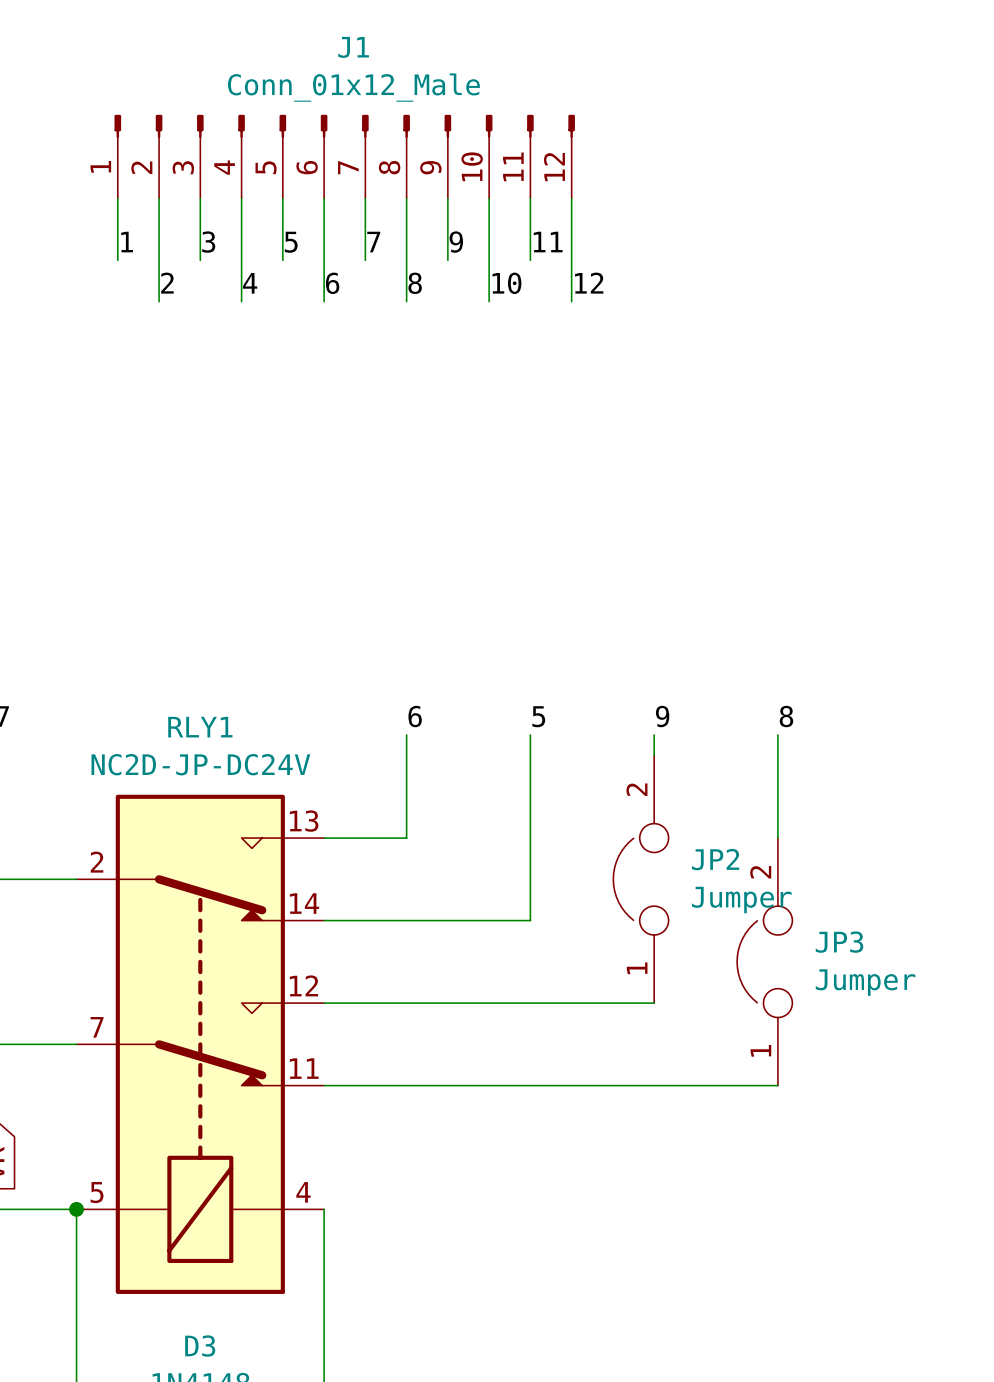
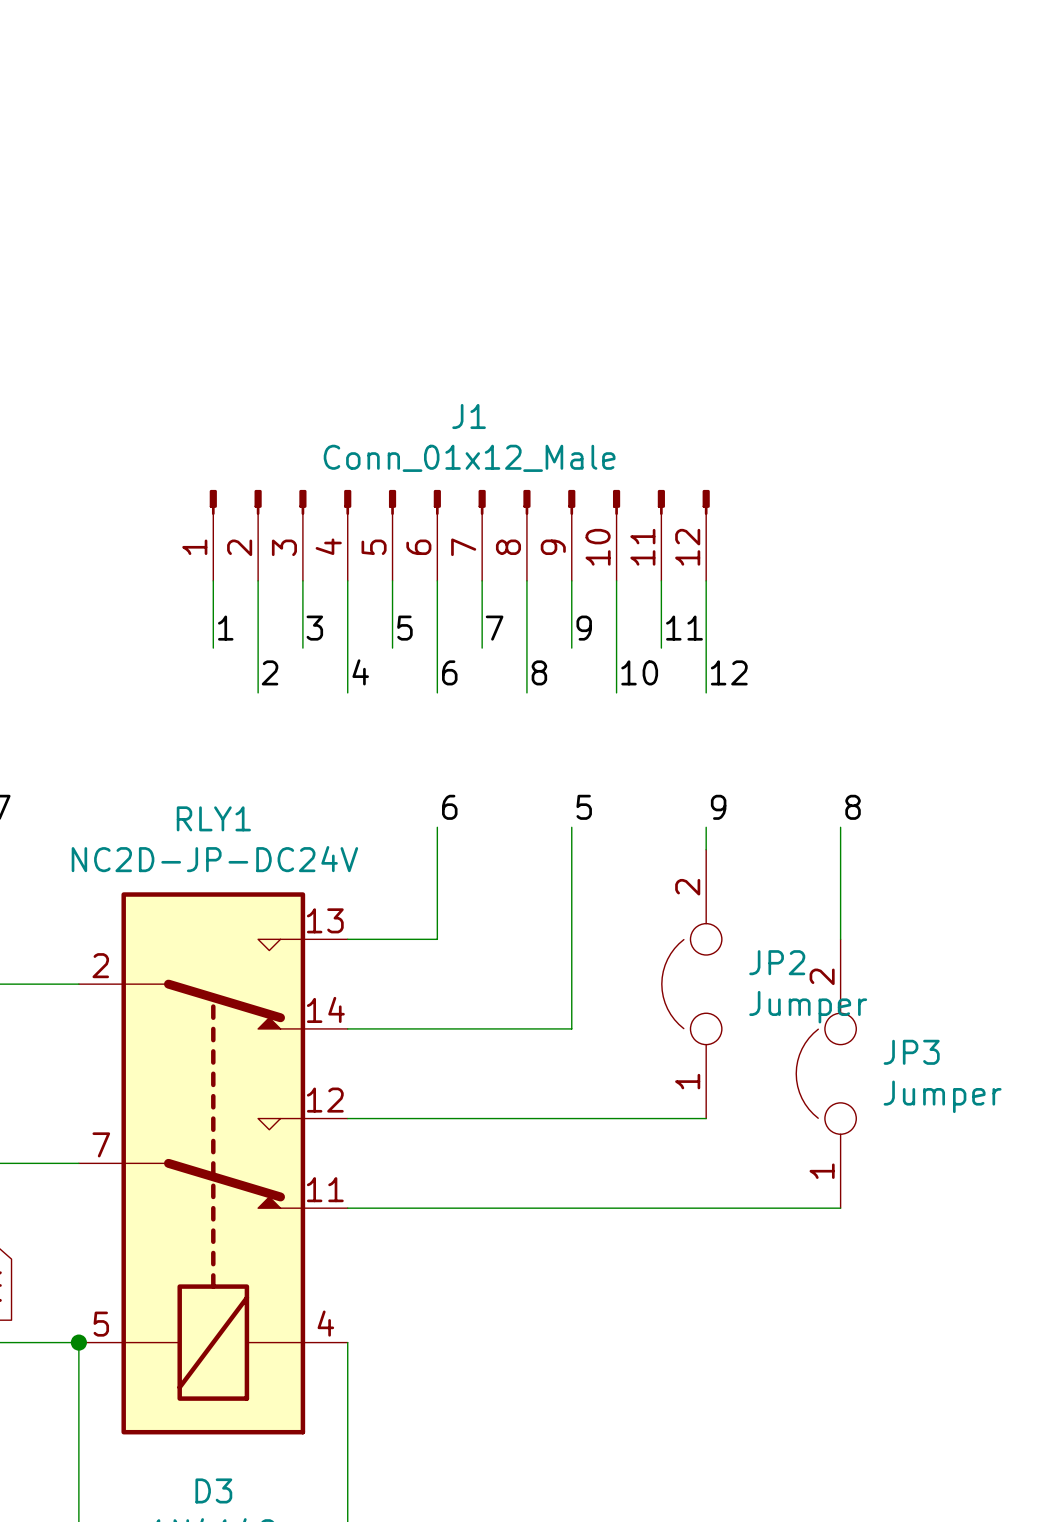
J1 position: (344, 156) -> (459, 535)
wire: (117, 198) (117, 260) -> (213, 580) (213, 648)
wire: (159, 198) (159, 301) -> (258, 580) (258, 692)
wire: (200, 198) (200, 260) -> (302, 580) (302, 648)
wire: (241, 198) (241, 301) -> (347, 580) (347, 692)
wire: (282, 198) (282, 260) -> (392, 580) (392, 648)
wire: (324, 198) (324, 301) -> (437, 580) (437, 692)
wire: (365, 198) (365, 260) -> (482, 580) (482, 648)
wire: (406, 198) (406, 301) -> (526, 580) (526, 692)
wire: (447, 198) (447, 260) -> (571, 580) (571, 648)
wire: (489, 198) (489, 301) -> (616, 580) (616, 692)
wire: (530, 198) (530, 260) -> (661, 580) (661, 648)
wire: (571, 198) (571, 301) -> (706, 580) (706, 692)
label position: 1 (127, 242) -> 1 (225, 628)
label position: 3 (208, 242) -> 3 (314, 628)
label position: 5 (291, 242) -> 5 (404, 628)
label position: 7 (373, 242) -> 7 (494, 628)
label position: 9 (456, 242) -> 9 (584, 628)
label position: 11 (548, 242) -> 11 (684, 628)
label position: 2 (167, 283) -> 2 (270, 672)
label position: 4 (250, 283) -> 4 (360, 672)
label position: 6 (332, 283) -> 6 (449, 672)
label position: 8 (415, 283) -> 8 (539, 672)
label position: 10 (506, 283) -> 10 (639, 672)
label position: 12 (589, 283) -> 12 (729, 672)

